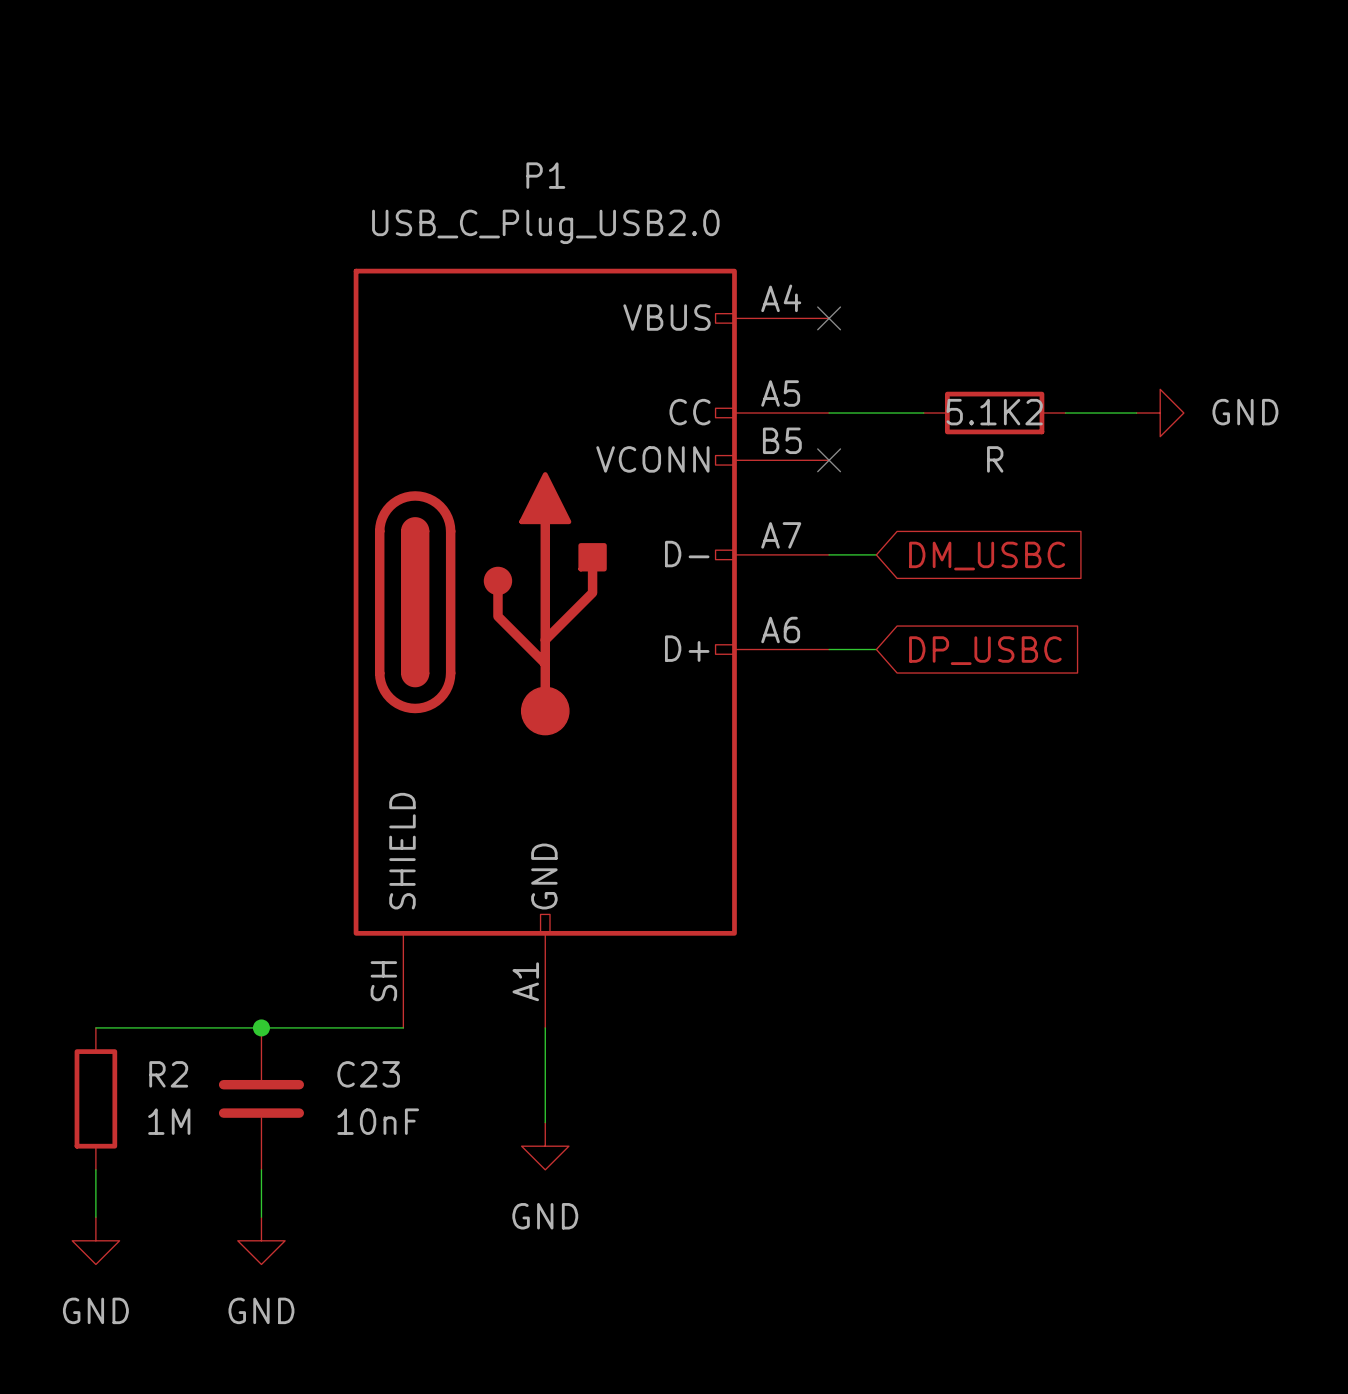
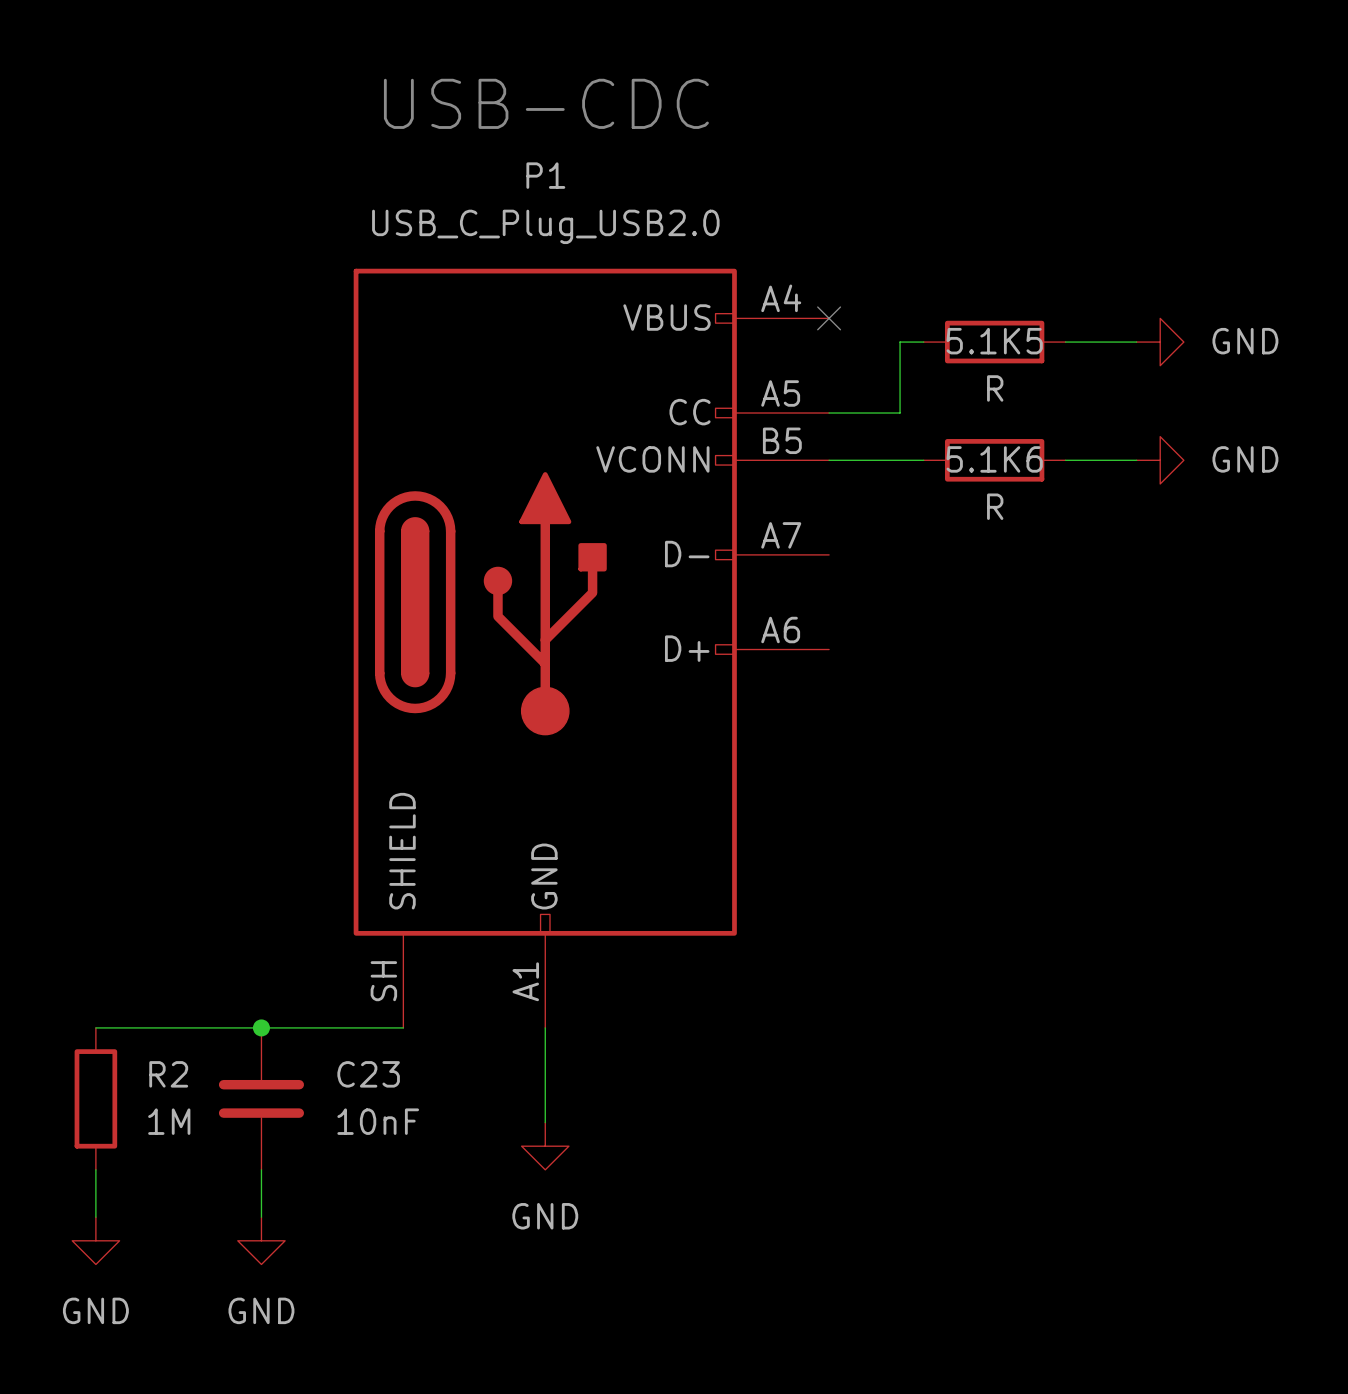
text: none -> USB-CDC (546, 103)
5.1K5: none -> R (994, 342)
wire: none -> (1065, 342) (1136, 342)
power symbol: none -> GND (1160, 342)
wire: (900, 413) (923, 413) -> (900, 413) (900, 342) (923, 342)
5.1K2: R (994, 413) -> none
wire: (1065, 413) (1136, 413) -> (1065, 460) (1136, 460)
power symbol: GND (1160, 413) -> none
wire: none -> (829, 460) (923, 460)
no-connect mark: (829, 460) -> none
5.1K6: none -> R (994, 460)
power symbol: none -> GND (1160, 460)
wire: (829, 554) (876, 554) -> none
global label: DM_USBC (987, 556) -> none
wire: (829, 649) (876, 649) -> none
global label: DP_USBC (985, 650) -> none

